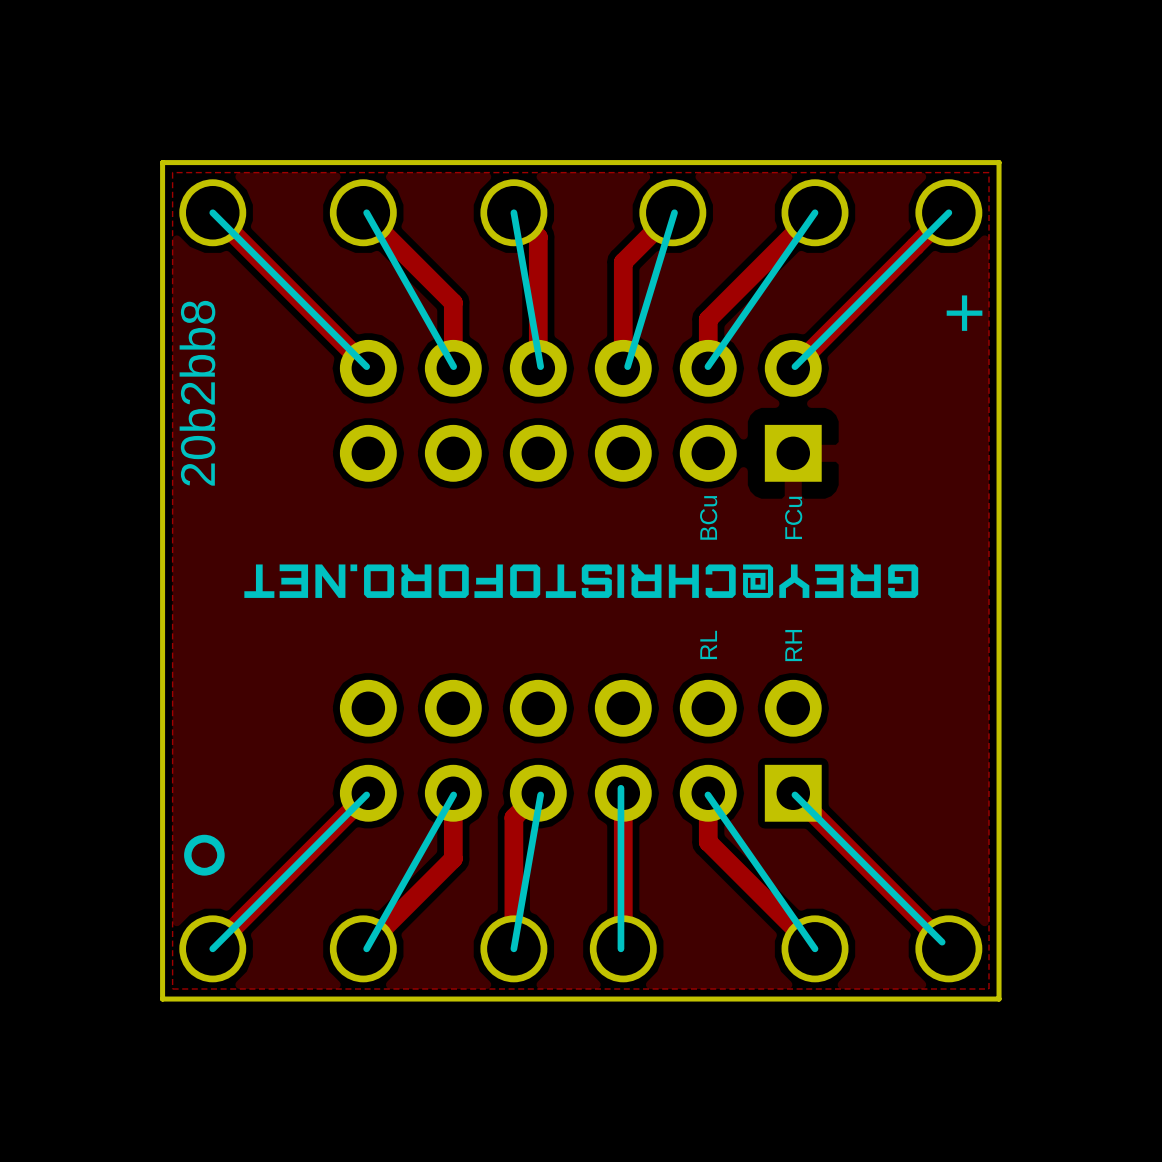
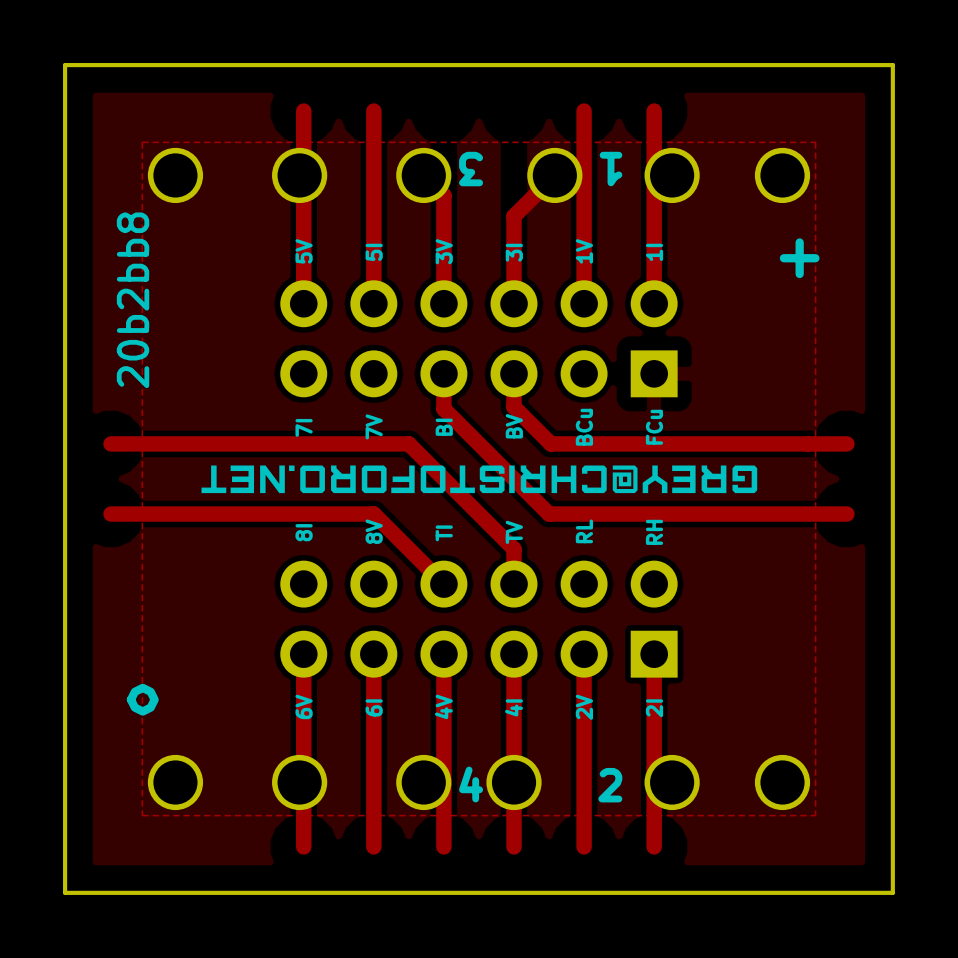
board edge: (162, 162) (999, 162) (999, 999) (162, 999) (162, 162) -> (65, 65) (65, 892) (892, 892) (892, 65) (65, 65)
text: none -> 3 (471, 169)
text: none -> 1 (611, 169)
line: (212, 212) (366, 366) -> none
track: (212, 212) (368, 368) -> (303, 111) (303, 303)
track: (363, 212) (453, 302) -> (373, 111) (373, 249)
line: (366, 212) (453, 366) -> none
line: (513, 212) (540, 366) -> none
line: (674, 212) (627, 366) -> none
line: (815, 212) (707, 366) -> none
track: (815, 212) (708, 319) -> (584, 111) (584, 263)
line: (948, 212) (794, 366) -> none
track: (948, 212) (793, 368) -> (654, 111) (654, 303)
text: none -> 1V (584, 251)
text: none -> 5V (304, 251)
text: none -> 3V (444, 251)
text: none -> 1I (654, 252)
text: none -> 5I (374, 252)
text: none -> 3I (514, 252)
text position: 20b2bb8 (197, 393) -> 20b2bb8 (133, 300)
track: none -> (443, 373) (443, 408) (549, 514) (846, 514)
track: none -> (514, 373) (514, 407) (550, 443) (846, 443)
text: none -> 7V (374, 426)
text: none -> BV (514, 426)
text: none -> 7I (304, 427)
text: none -> BI (444, 427)
track: none -> (111, 443) (408, 443) (514, 549) (514, 584)
track: none -> (111, 514) (373, 514) (443, 584)
text: none -> 8V (374, 531)
text: none -> TV (514, 532)
text: none -> 8I (304, 532)
text: none -> TI (444, 533)
line: (620, 788) (620, 948) -> none
track: (368, 793) (212, 948) -> (303, 654) (303, 846)
track: (538, 793) (513, 817) (513, 948) -> (443, 654) (443, 846)
track: (793, 793) (948, 948) -> (654, 654) (654, 846)
line: (366, 794) (212, 948) -> none
line: (453, 794) (366, 948) -> none
line: (540, 794) (513, 948) -> none
line: (707, 794) (815, 948) -> none
line: (794, 794) (942, 942) -> none
track: (708, 842) (815, 948) -> (584, 694) (584, 846)
text position: ° (204, 855) -> ° (142, 699)
text: none -> 6V (304, 706)
text: none -> 4V (443, 706)
text: none -> 2V (584, 707)
track: (453, 858) (363, 948) -> (373, 708) (373, 846)
text: none -> 6I (374, 707)
text: none -> 4I (514, 707)
text: none -> 2I (654, 708)
track: none -> (514, 782) (514, 846)
text: none -> 2 (610, 785)
text: none -> 4 (471, 784)

